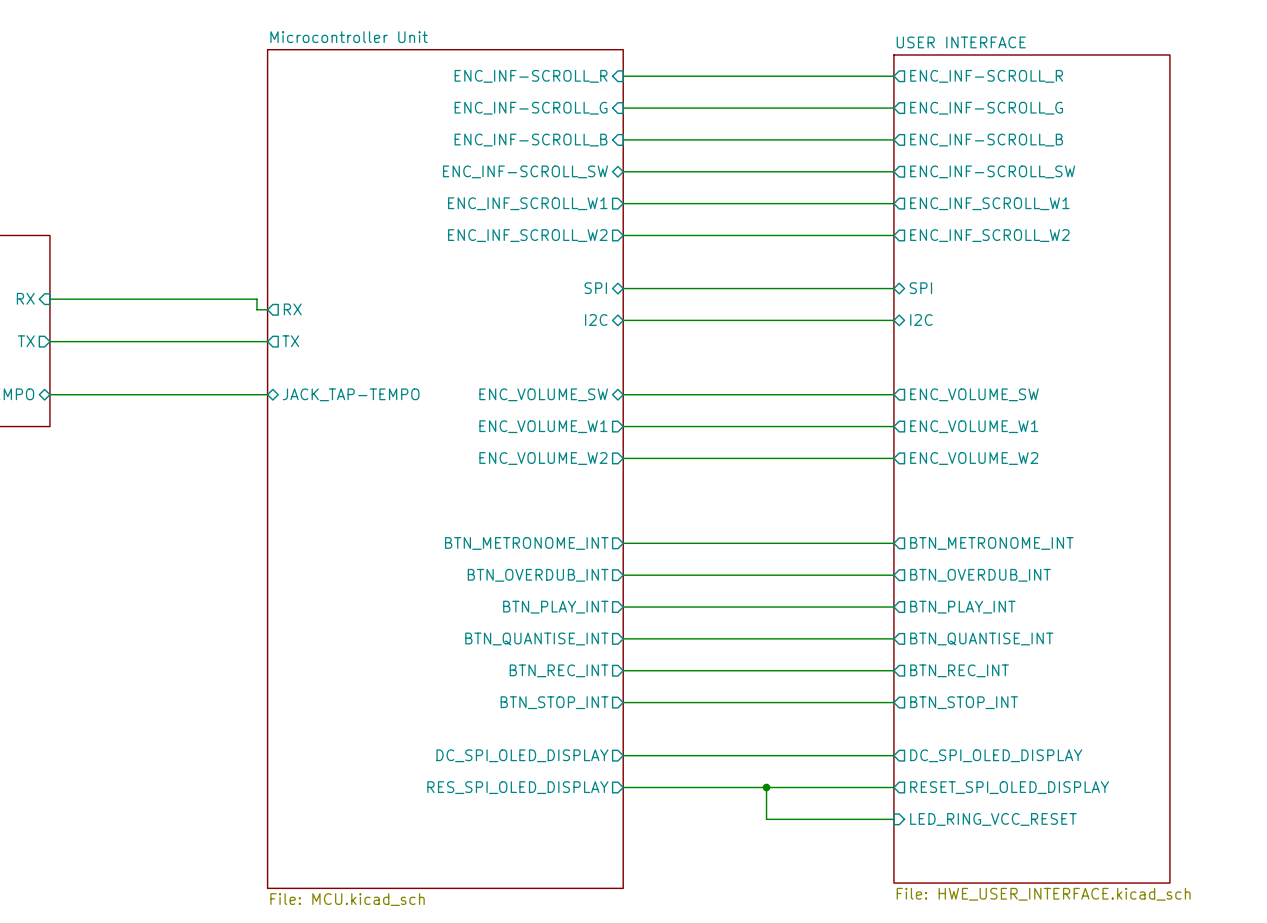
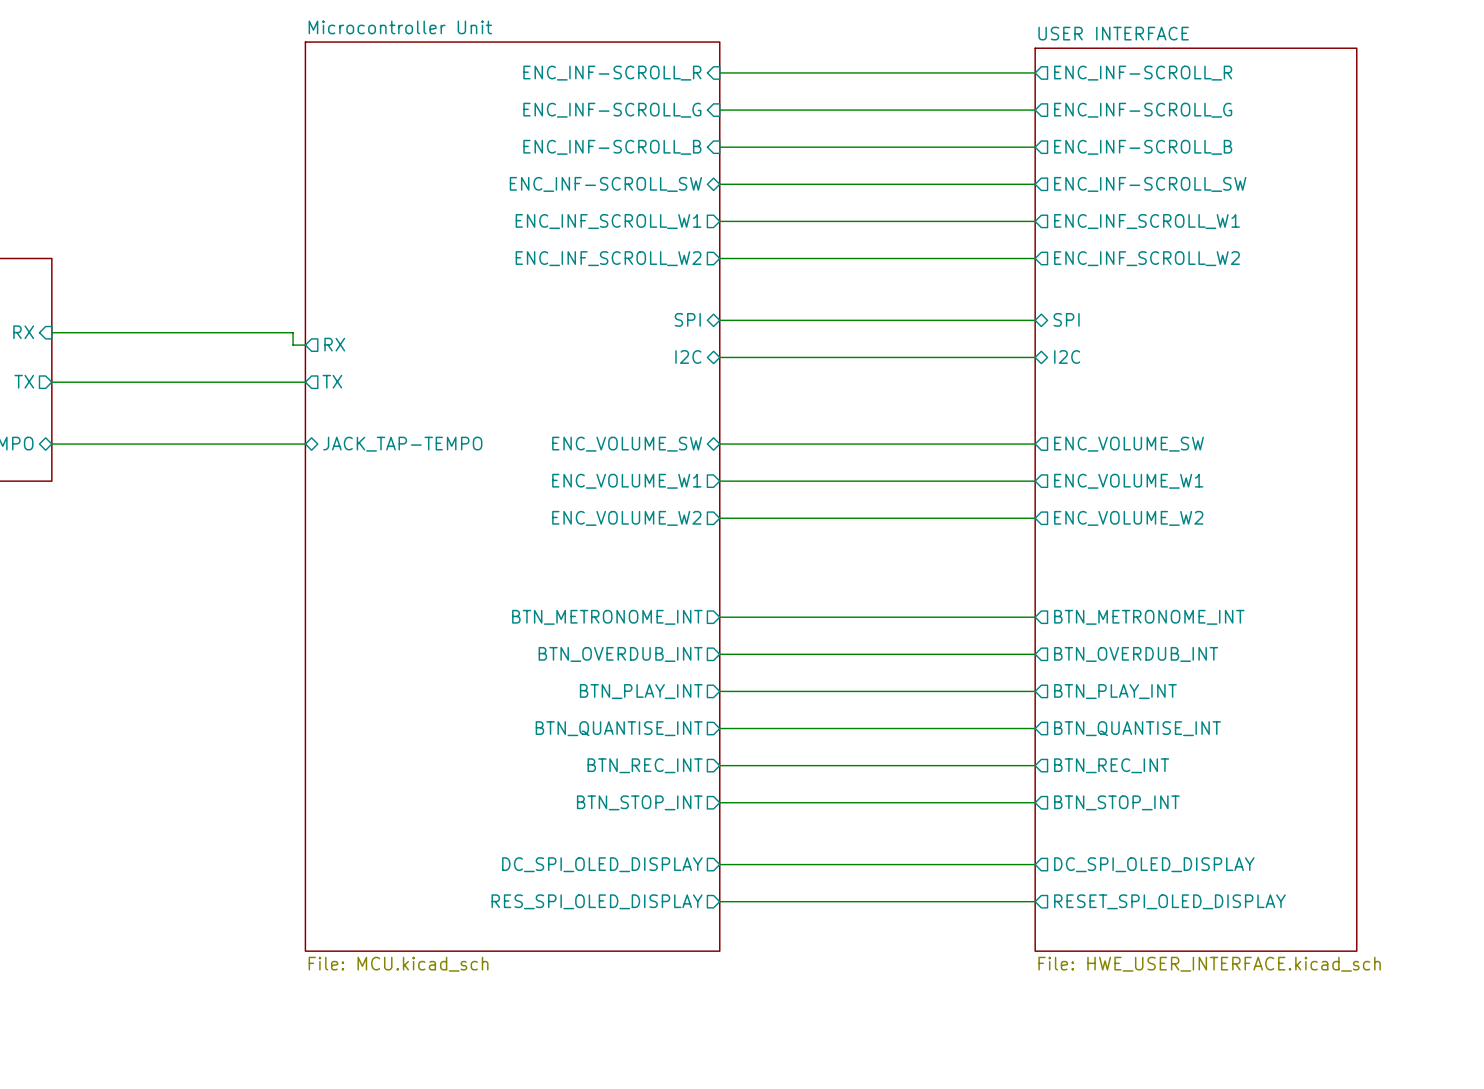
sheet Microcontroller Unit: none -> File: MCU.kicad_sch (512, 496)
sheet USER INTERFACE: none -> File: HWE_USER_INTERFACE.kicad_sch (1195, 499)
sheet Microcontroller Unit: File: MCU.kicad_sch (445, 469) -> none
sheet USER INTERFACE: File: HWE_USER_INTERFACE.kicad_sch (1031, 469) -> none
wire: (766, 787) (766, 819) (893, 819) -> none
junction: (766, 787) -> none
sheet pin: LED_RING_VCC_RESET (993, 819) -> none

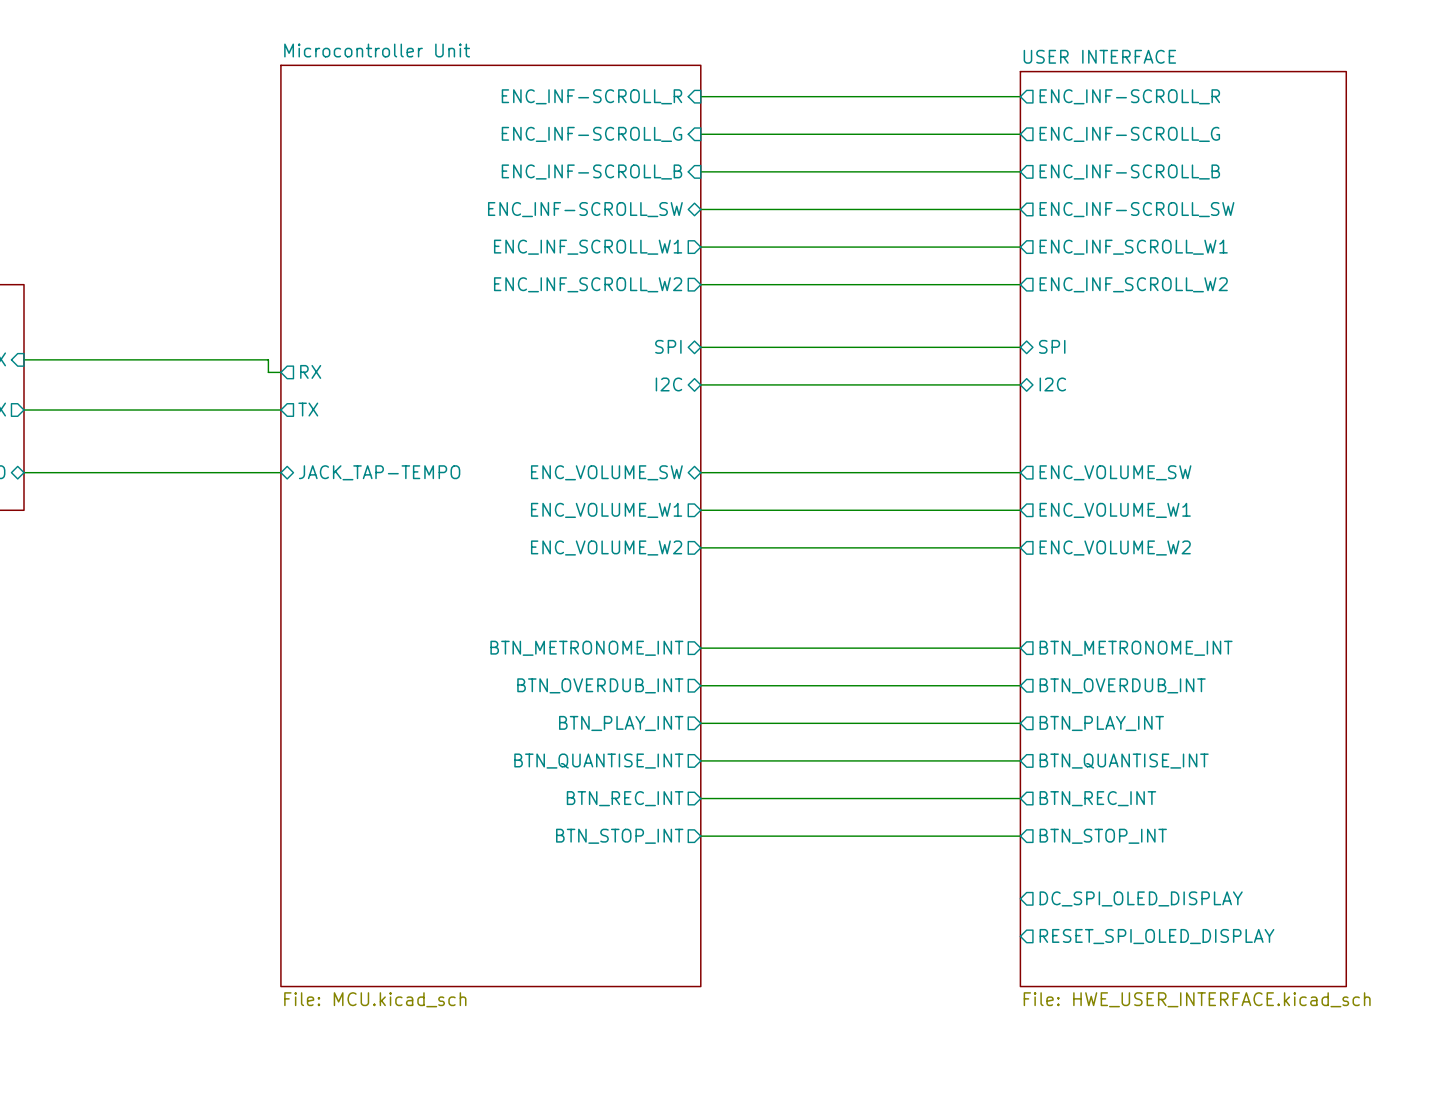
sheet pin: DC_SPI_OLED_DISPLAY (602, 864) -> none
wire: (719, 864) (1035, 864) -> none
sheet pin: RES_SPI_OLED_DISPLAY (597, 901) -> none
wire: (719, 901) (1035, 901) -> none

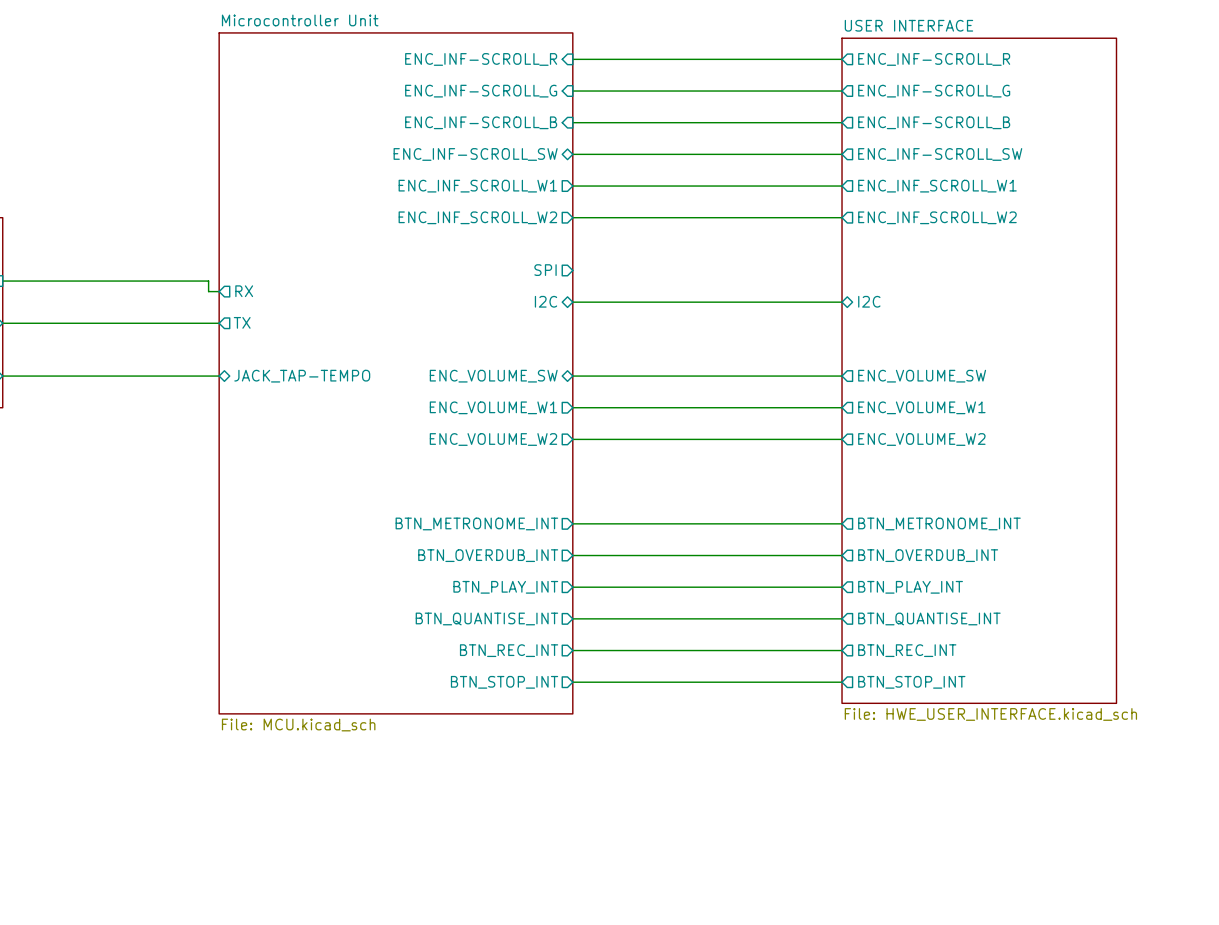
sheet pin shape: bidirectional (668, 346) -> output (545, 270)
sheet pin: SPI (1052, 346) -> none
wire: (700, 347) (1020, 347) -> none
sheet USER INTERFACE: none -> File: HWE_USER_INTERFACE.kicad_sch (979, 370)
sheet Microcontroller Unit: none -> File: MCU.kicad_sch (395, 373)
sheet Microcontroller Unit: File: MCU.kicad_sch (490, 525) -> none
sheet USER INTERFACE: File: HWE_USER_INTERFACE.kicad_sch (1183, 529) -> none
sheet pin: DC_SPI_OLED_DISPLAY (1141, 898) -> none
sheet pin: RESET_SPI_OLED_DISPLAY (1156, 936) -> none

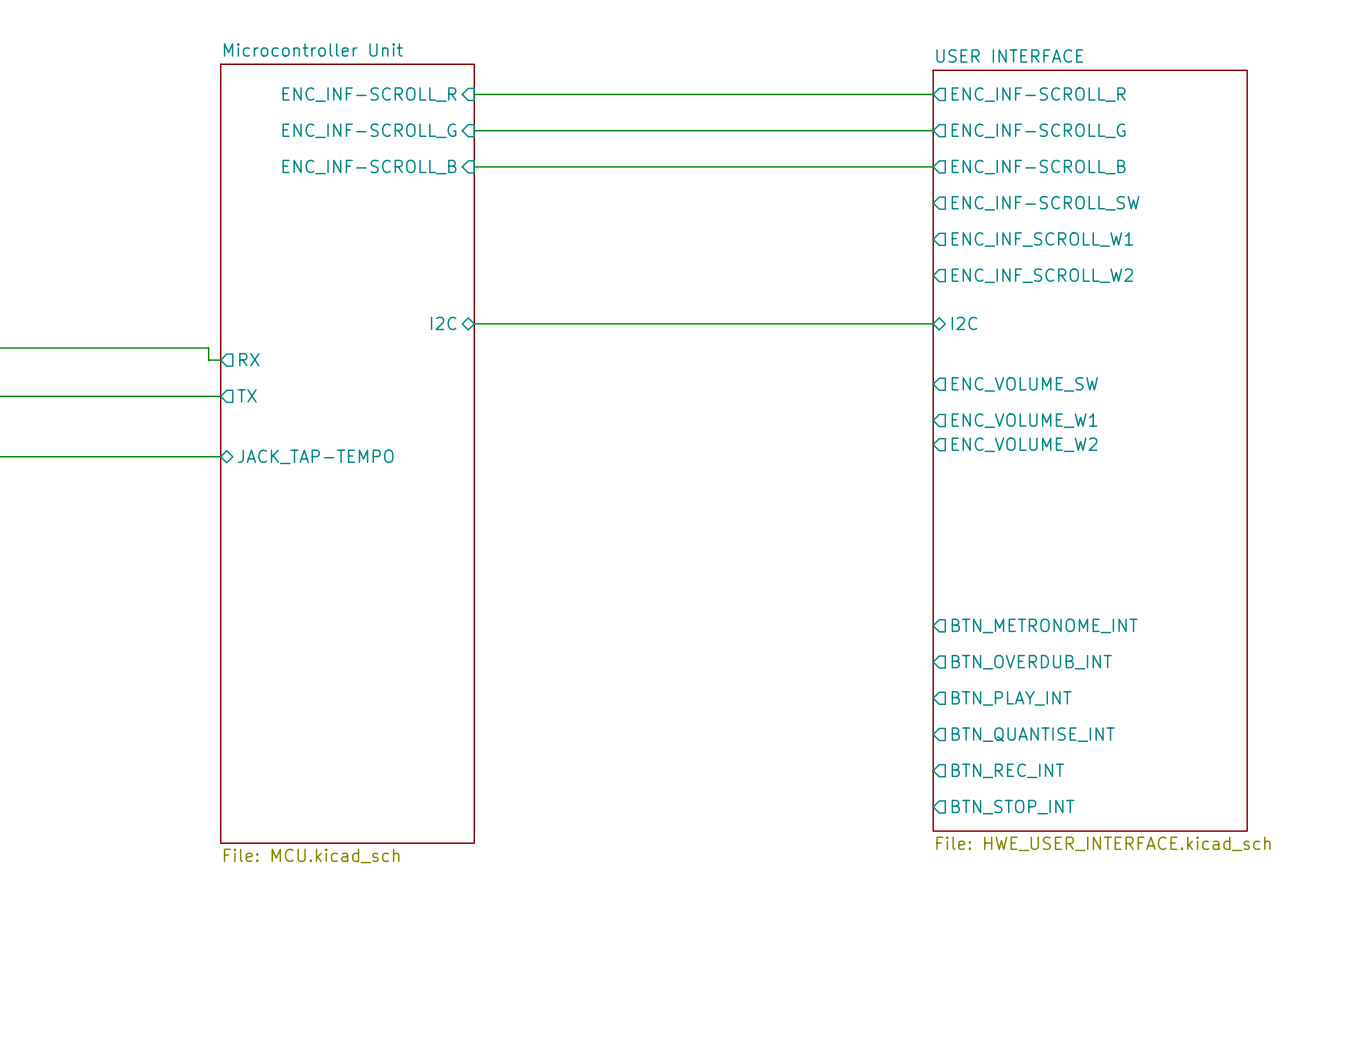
wire: none -> (474, 94) (625, 94)
sheet pin position: ENC_INF-SCROLL_R (481, 59) -> ENC_INF-SCROLL_R (369, 94)
wire: none -> (474, 130) (625, 130)
sheet pin position: ENC_INF-SCROLL_G (481, 91) -> ENC_INF-SCROLL_G (369, 130)
wire: none -> (474, 166) (625, 166)
sheet pin position: ENC_INF-SCROLL_B (481, 122) -> ENC_INF-SCROLL_B (369, 167)
sheet pin: ENC_INF-SCROLL_SW (475, 154) -> none
wire: (572, 154) (842, 154) -> none
sheet pin: ENC_INF_SCROLL_W1 (477, 186) -> none
wire: (572, 186) (842, 186) -> none
sheet pin: ENC_INF_SCROLL_W2 (477, 217) -> none
wire: (572, 217) (842, 217) -> none
wire: none -> (474, 323) (933, 323)
sheet pin: SPI (545, 270) -> none
sheet pin position: I2C (546, 301) -> I2C (443, 323)
sheet pin position: I2C (869, 301) -> I2C (964, 323)
wire: (572, 302) (842, 302) -> none
sheet Microcontroller Unit: none -> File: MCU.kicad_sch (347, 453)
sheet Microcontroller Unit: File: MCU.kicad_sch (395, 373) -> none
sheet pin: ENC_VOLUME_SW (493, 376) -> none
wire: (572, 376) (842, 376) -> none
sheet pin position: ENC_VOLUME_SW (922, 376) -> ENC_VOLUME_SW (1024, 384)
sheet pin: ENC_VOLUME_W1 (493, 407) -> none
wire: (572, 407) (842, 407) -> none
sheet pin position: ENC_VOLUME_W1 (921, 407) -> ENC_VOLUME_W1 (1024, 420)
sheet pin: ENC_VOLUME_W2 (493, 439) -> none
wire: (572, 439) (842, 439) -> none
sheet pin position: ENC_VOLUME_W2 (921, 439) -> ENC_VOLUME_W2 (1024, 444)
sheet pin: BTN_METRONOME_INT (476, 523) -> none
wire: (572, 523) (842, 523) -> none
sheet pin: BTN_OVERDUB_INT (488, 555) -> none
wire: (572, 555) (842, 555) -> none
sheet pin: BTN_PLAY_INT (505, 587) -> none
wire: (572, 587) (842, 587) -> none
sheet pin: BTN_QUANTISE_INT (486, 618) -> none
wire: (572, 618) (842, 618) -> none
sheet pin: BTN_REC_INT (509, 650) -> none
wire: (572, 650) (842, 650) -> none
sheet pin: BTN_STOP_INT (504, 682) -> none
wire: (572, 682) (842, 682) -> none

